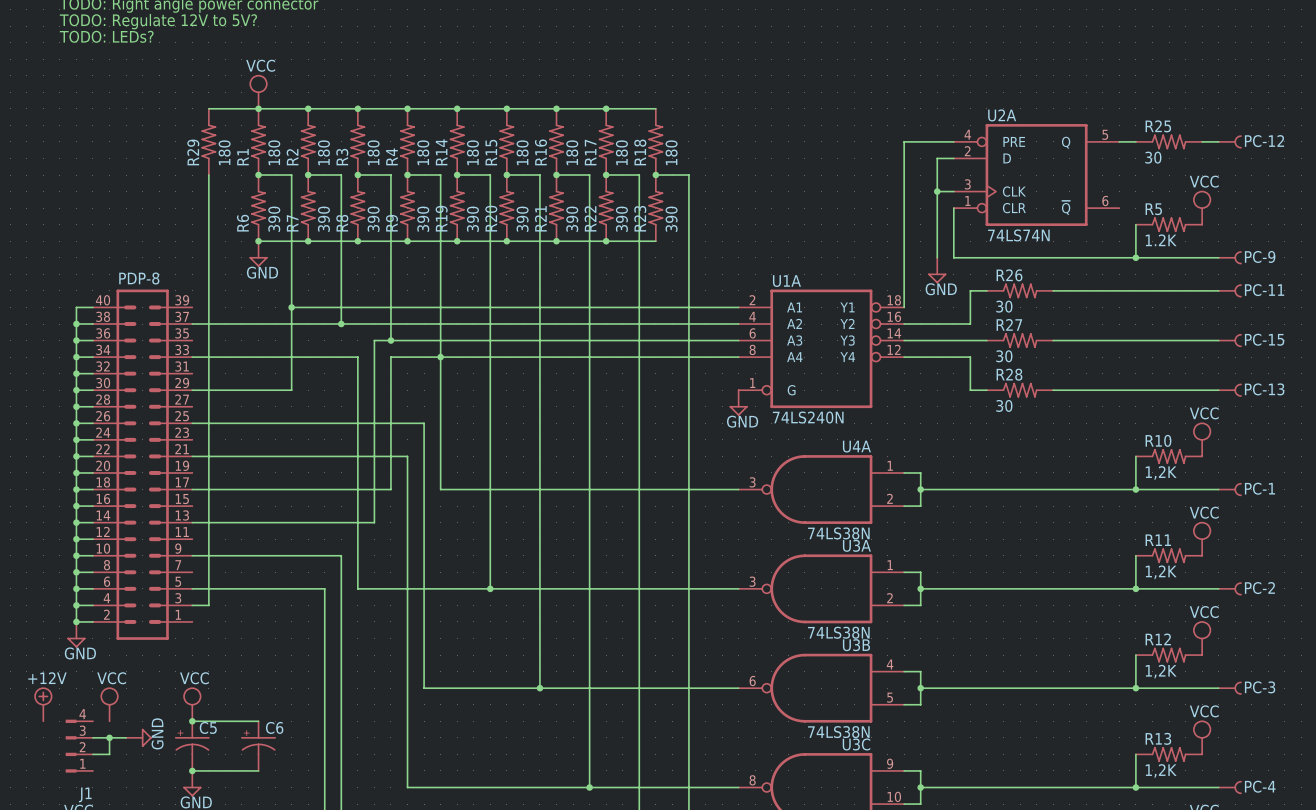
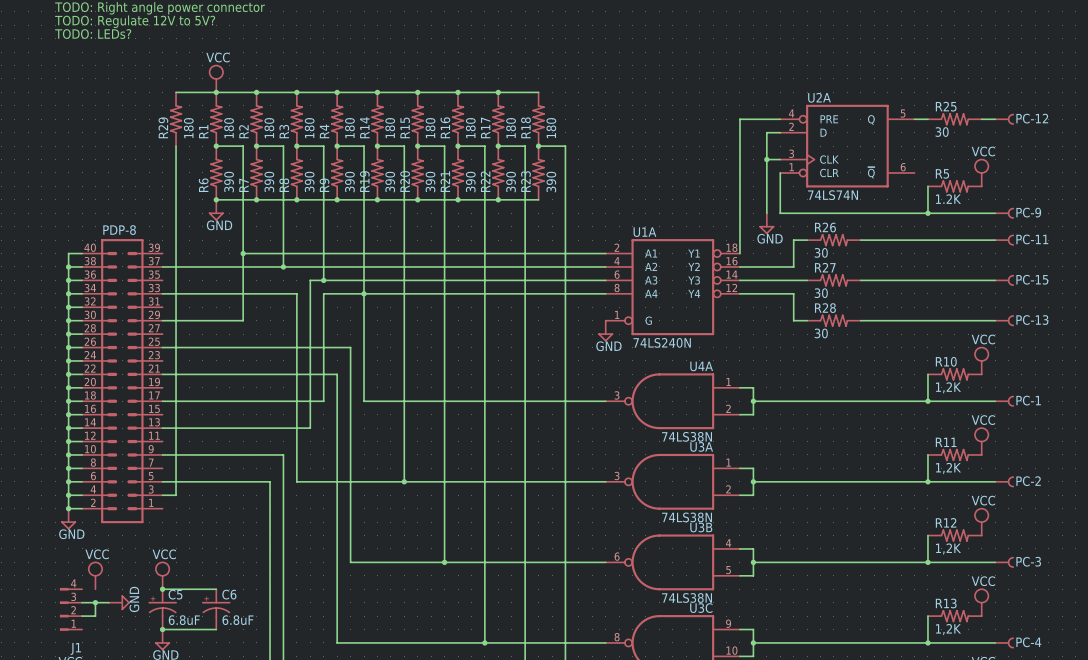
power symbol: +12V (43, 704) -> none
C5 value: none -> 6.8uF (184, 620)
C6 value: none -> 6.8uF (237, 620)

